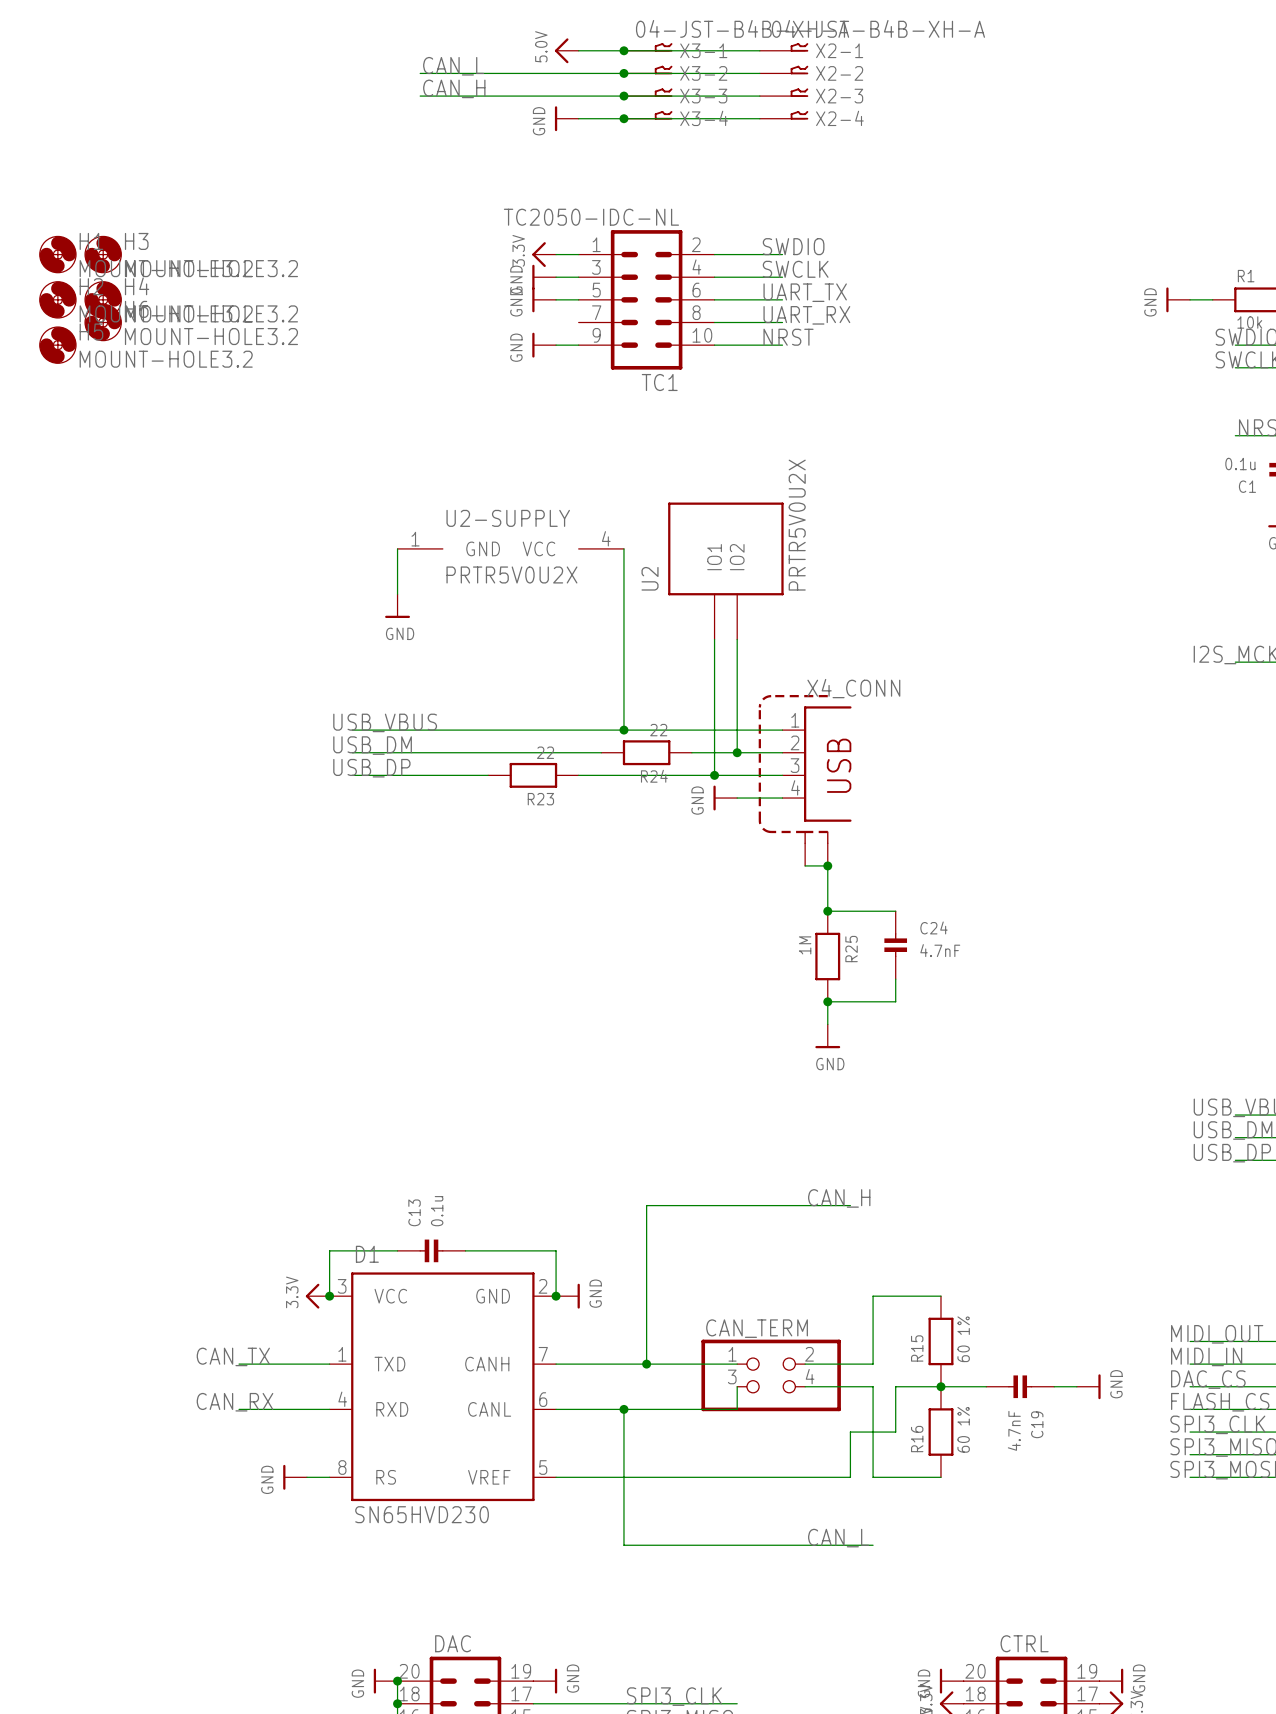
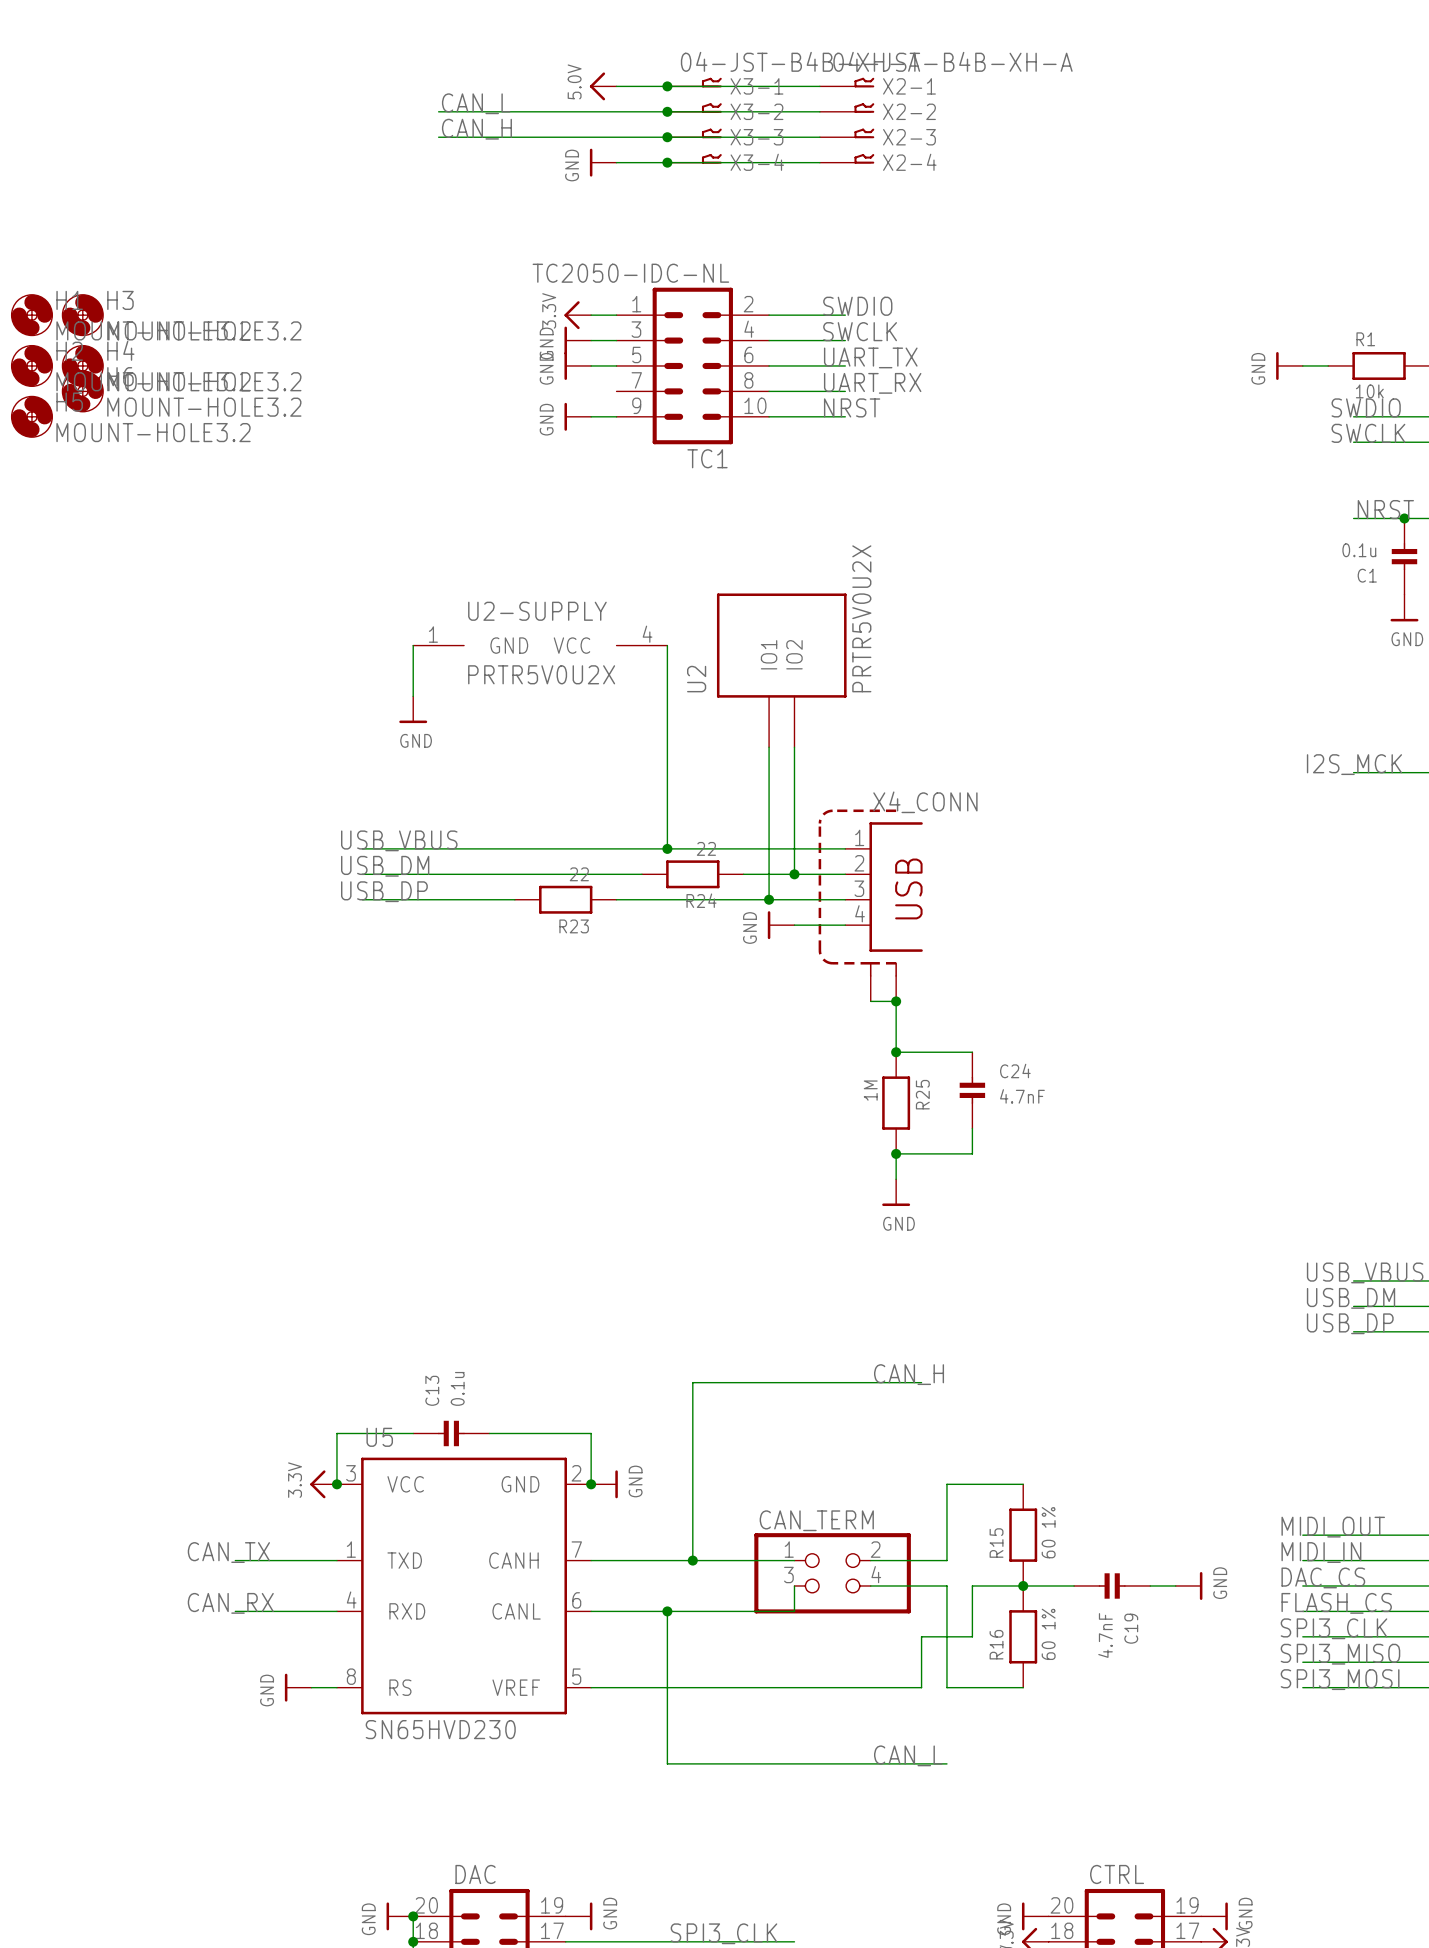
D1 name: D1 (367, 1254) -> U5 (379, 1437)

